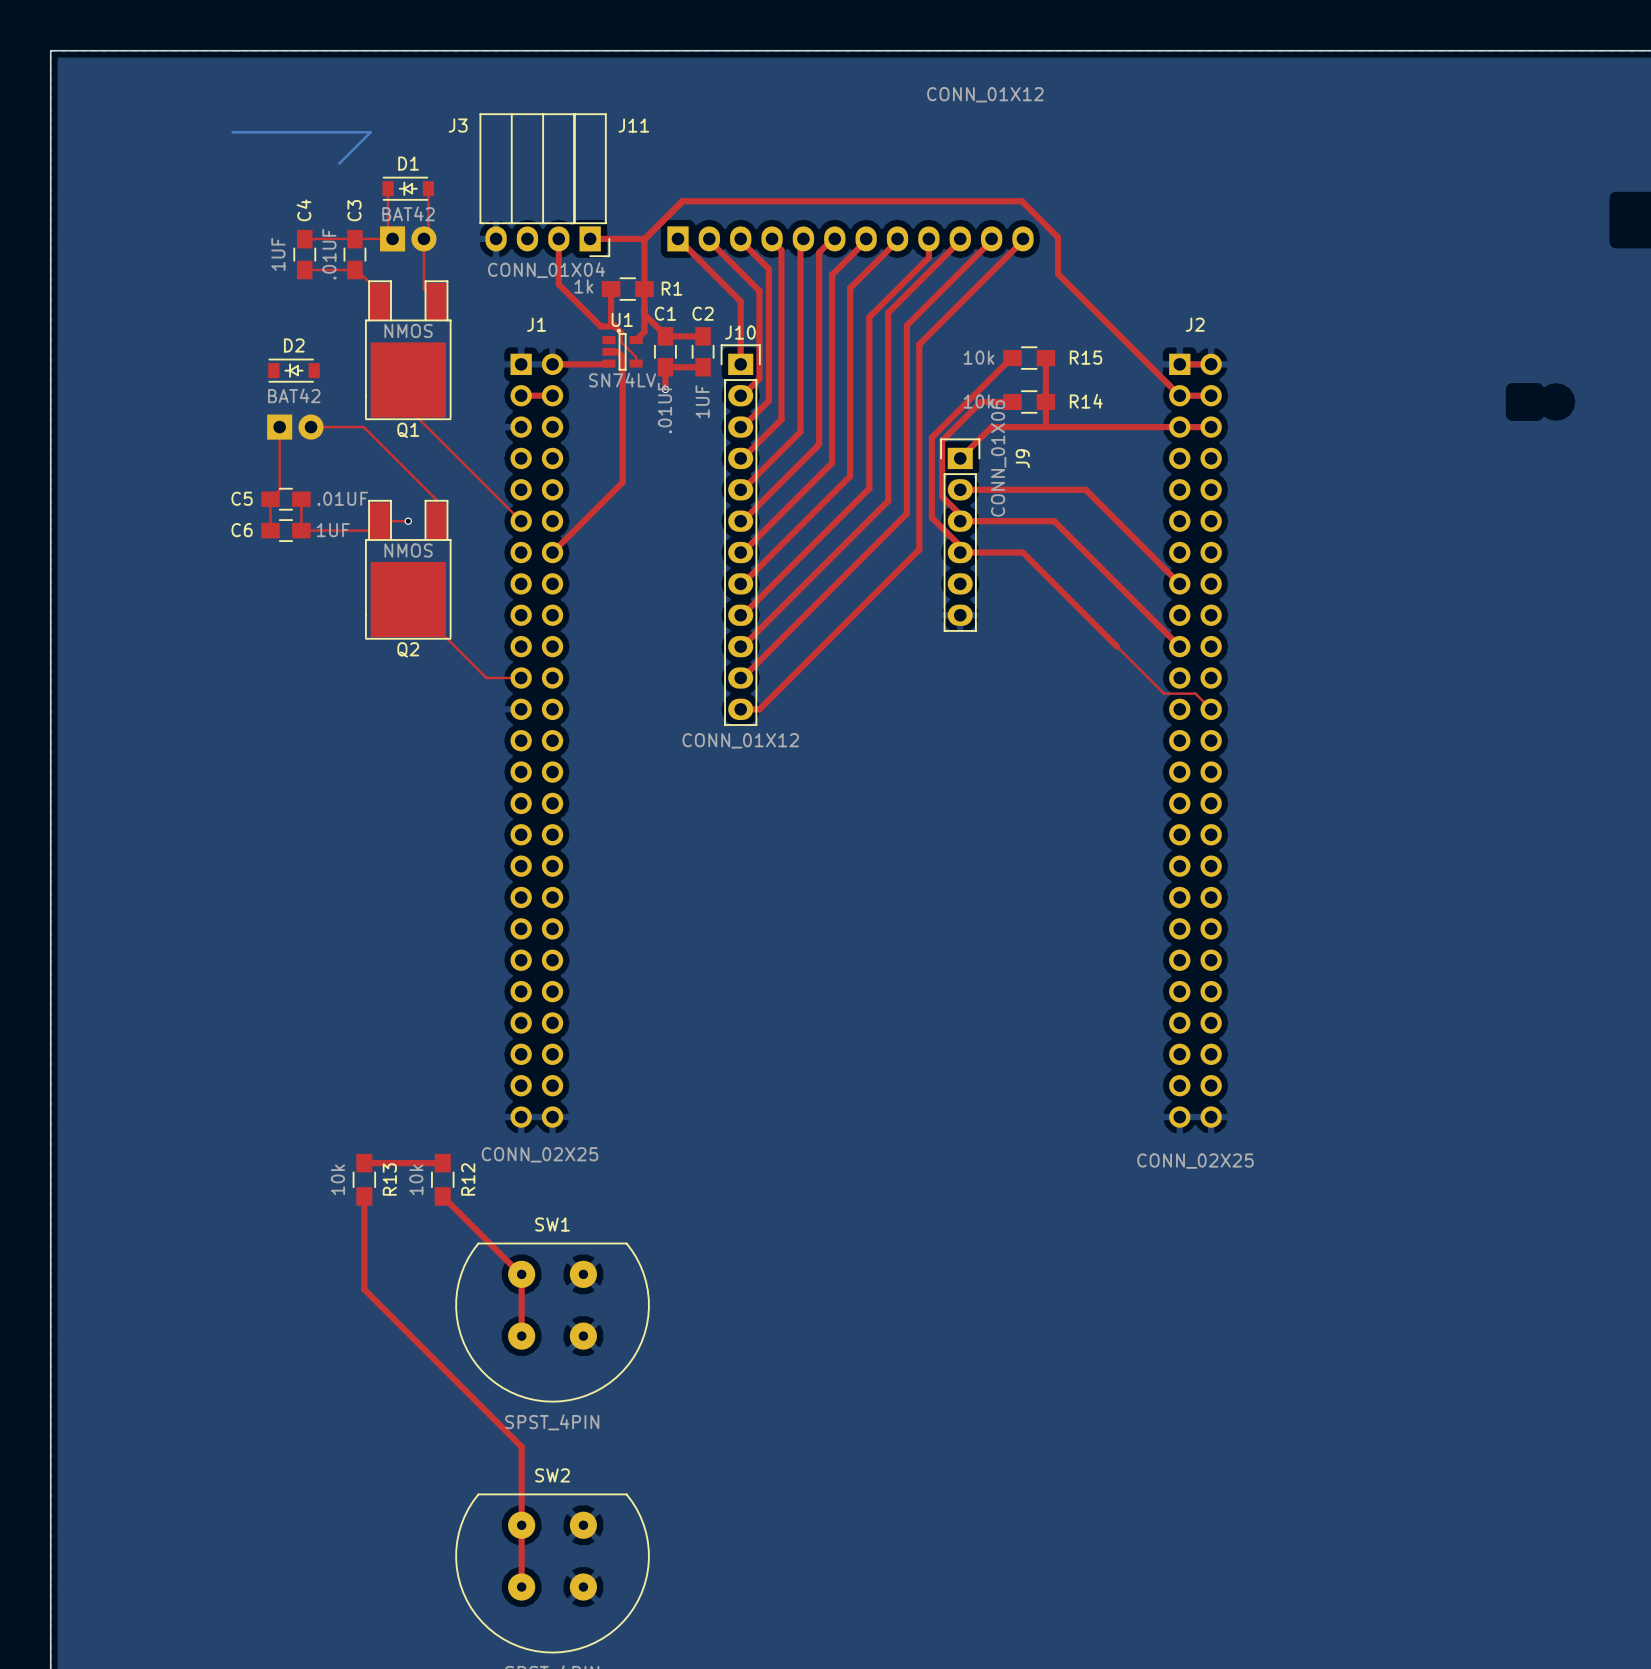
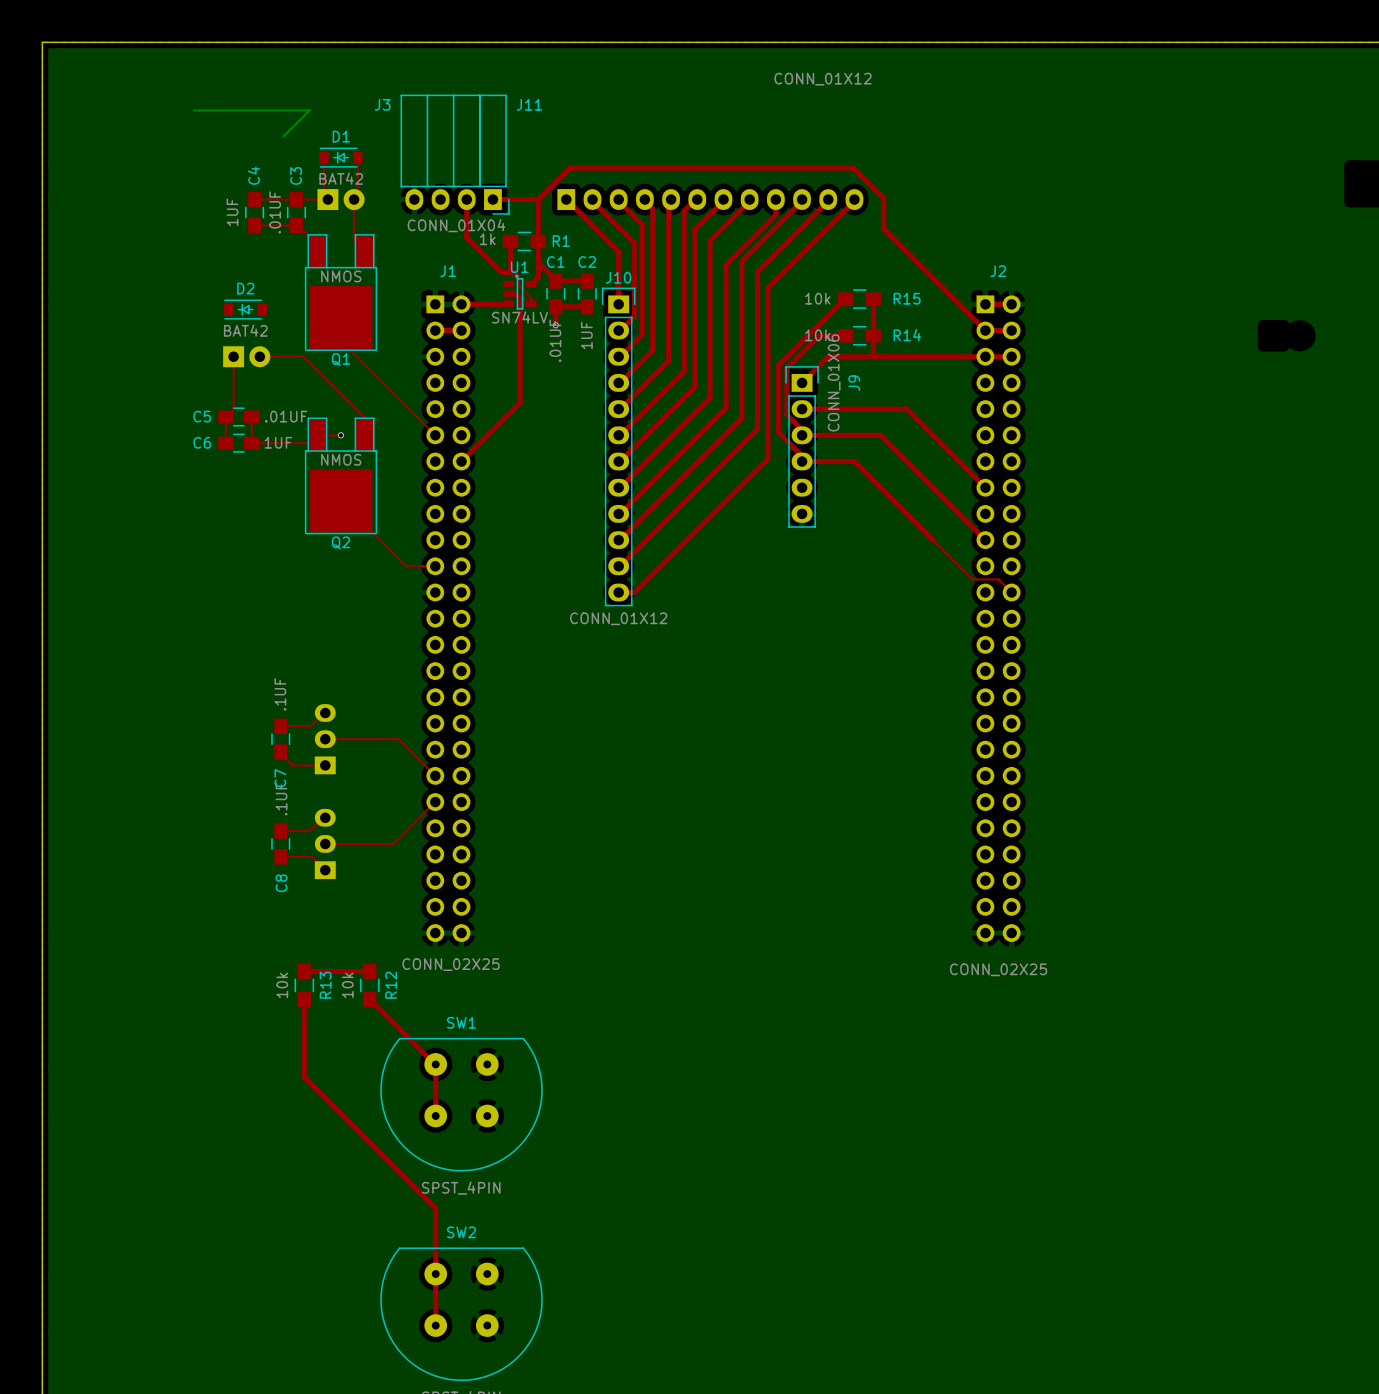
top track: none -> (325, 712) (310, 726) (280, 726)
C7: none -> .1UF (280, 739)
top track: none -> (325, 739) (398, 739) (435, 775)
part: none -> (325, 739)
top track: none -> (280, 752) (292, 765) (325, 765)
top track: none -> (435, 802) (393, 843) (325, 843)
top track: none -> (325, 817) (322, 817) (309, 831) (280, 831)
C8: none -> .1UF (280, 843)
part: none -> (325, 843)
top track: none -> (280, 856) (311, 856) (325, 870)

